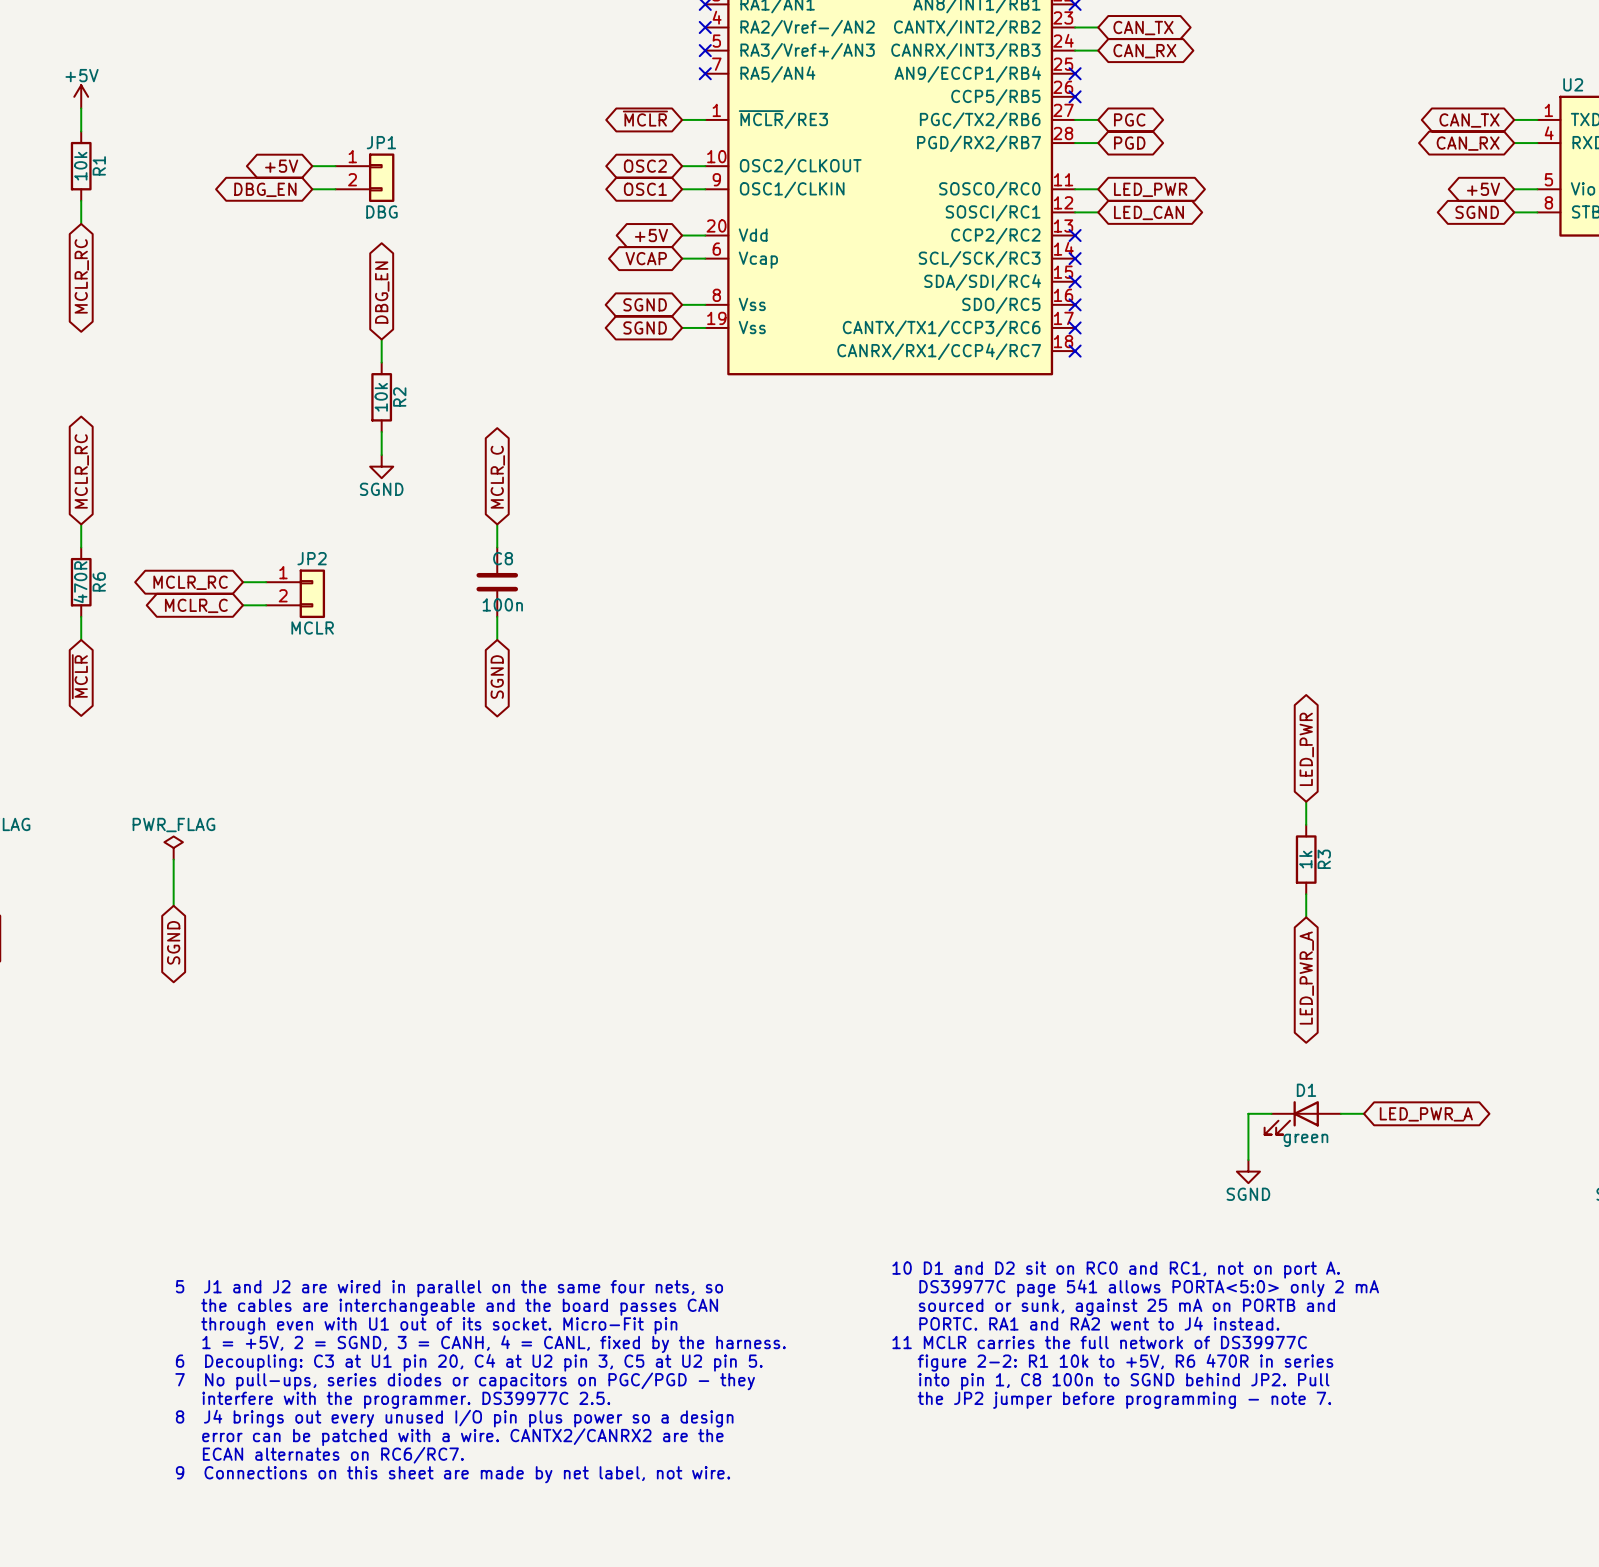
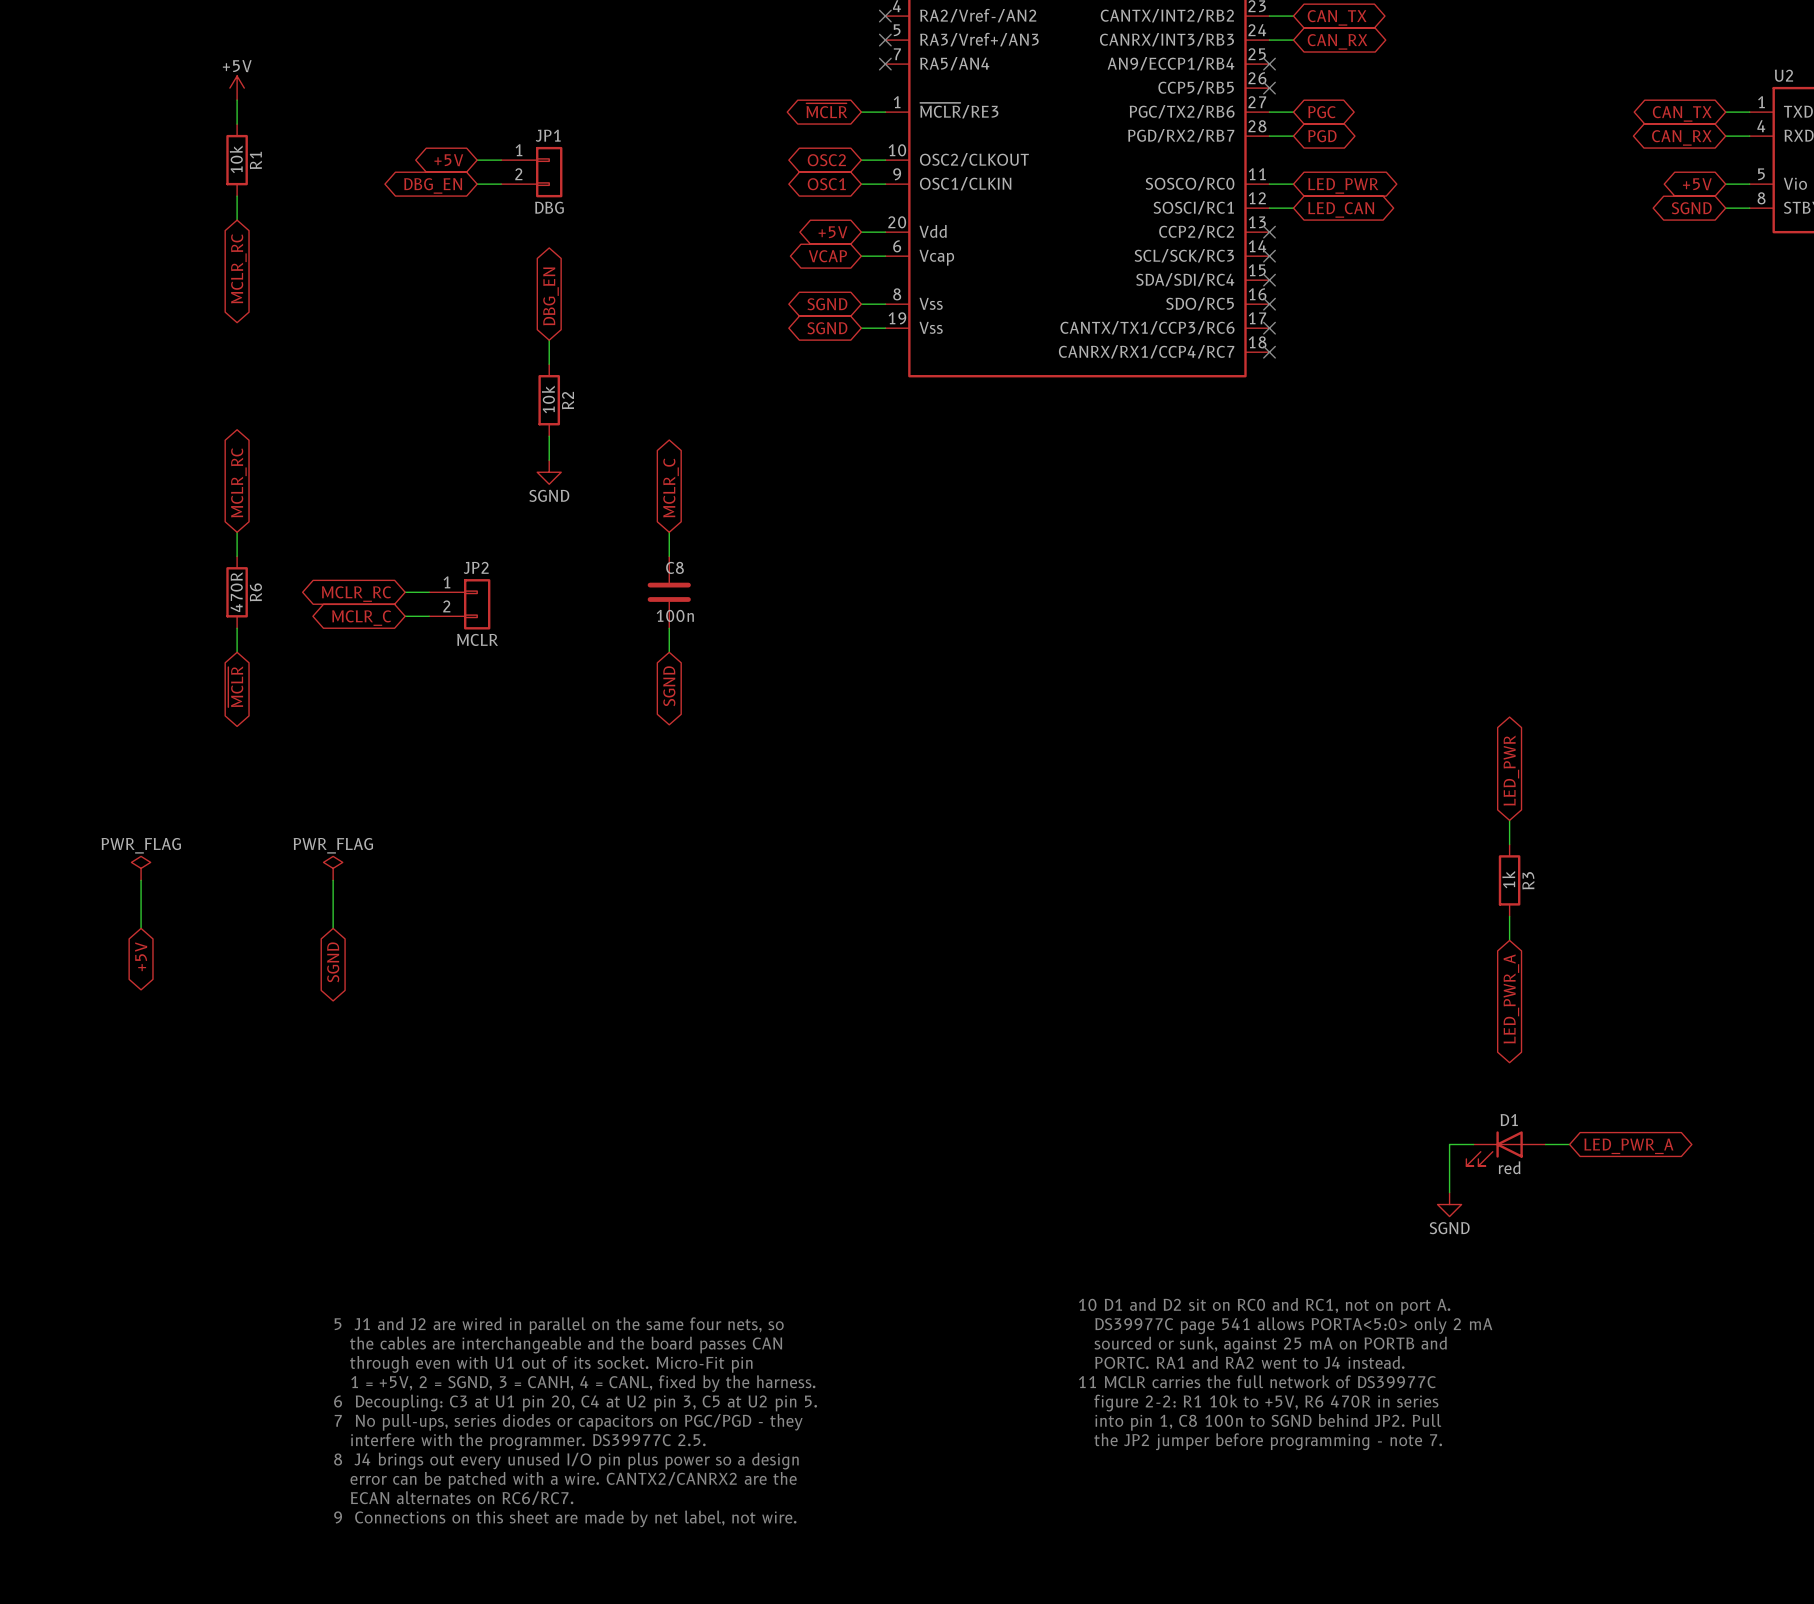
D1 value: green (1305, 1140) -> red (1509, 1167)

